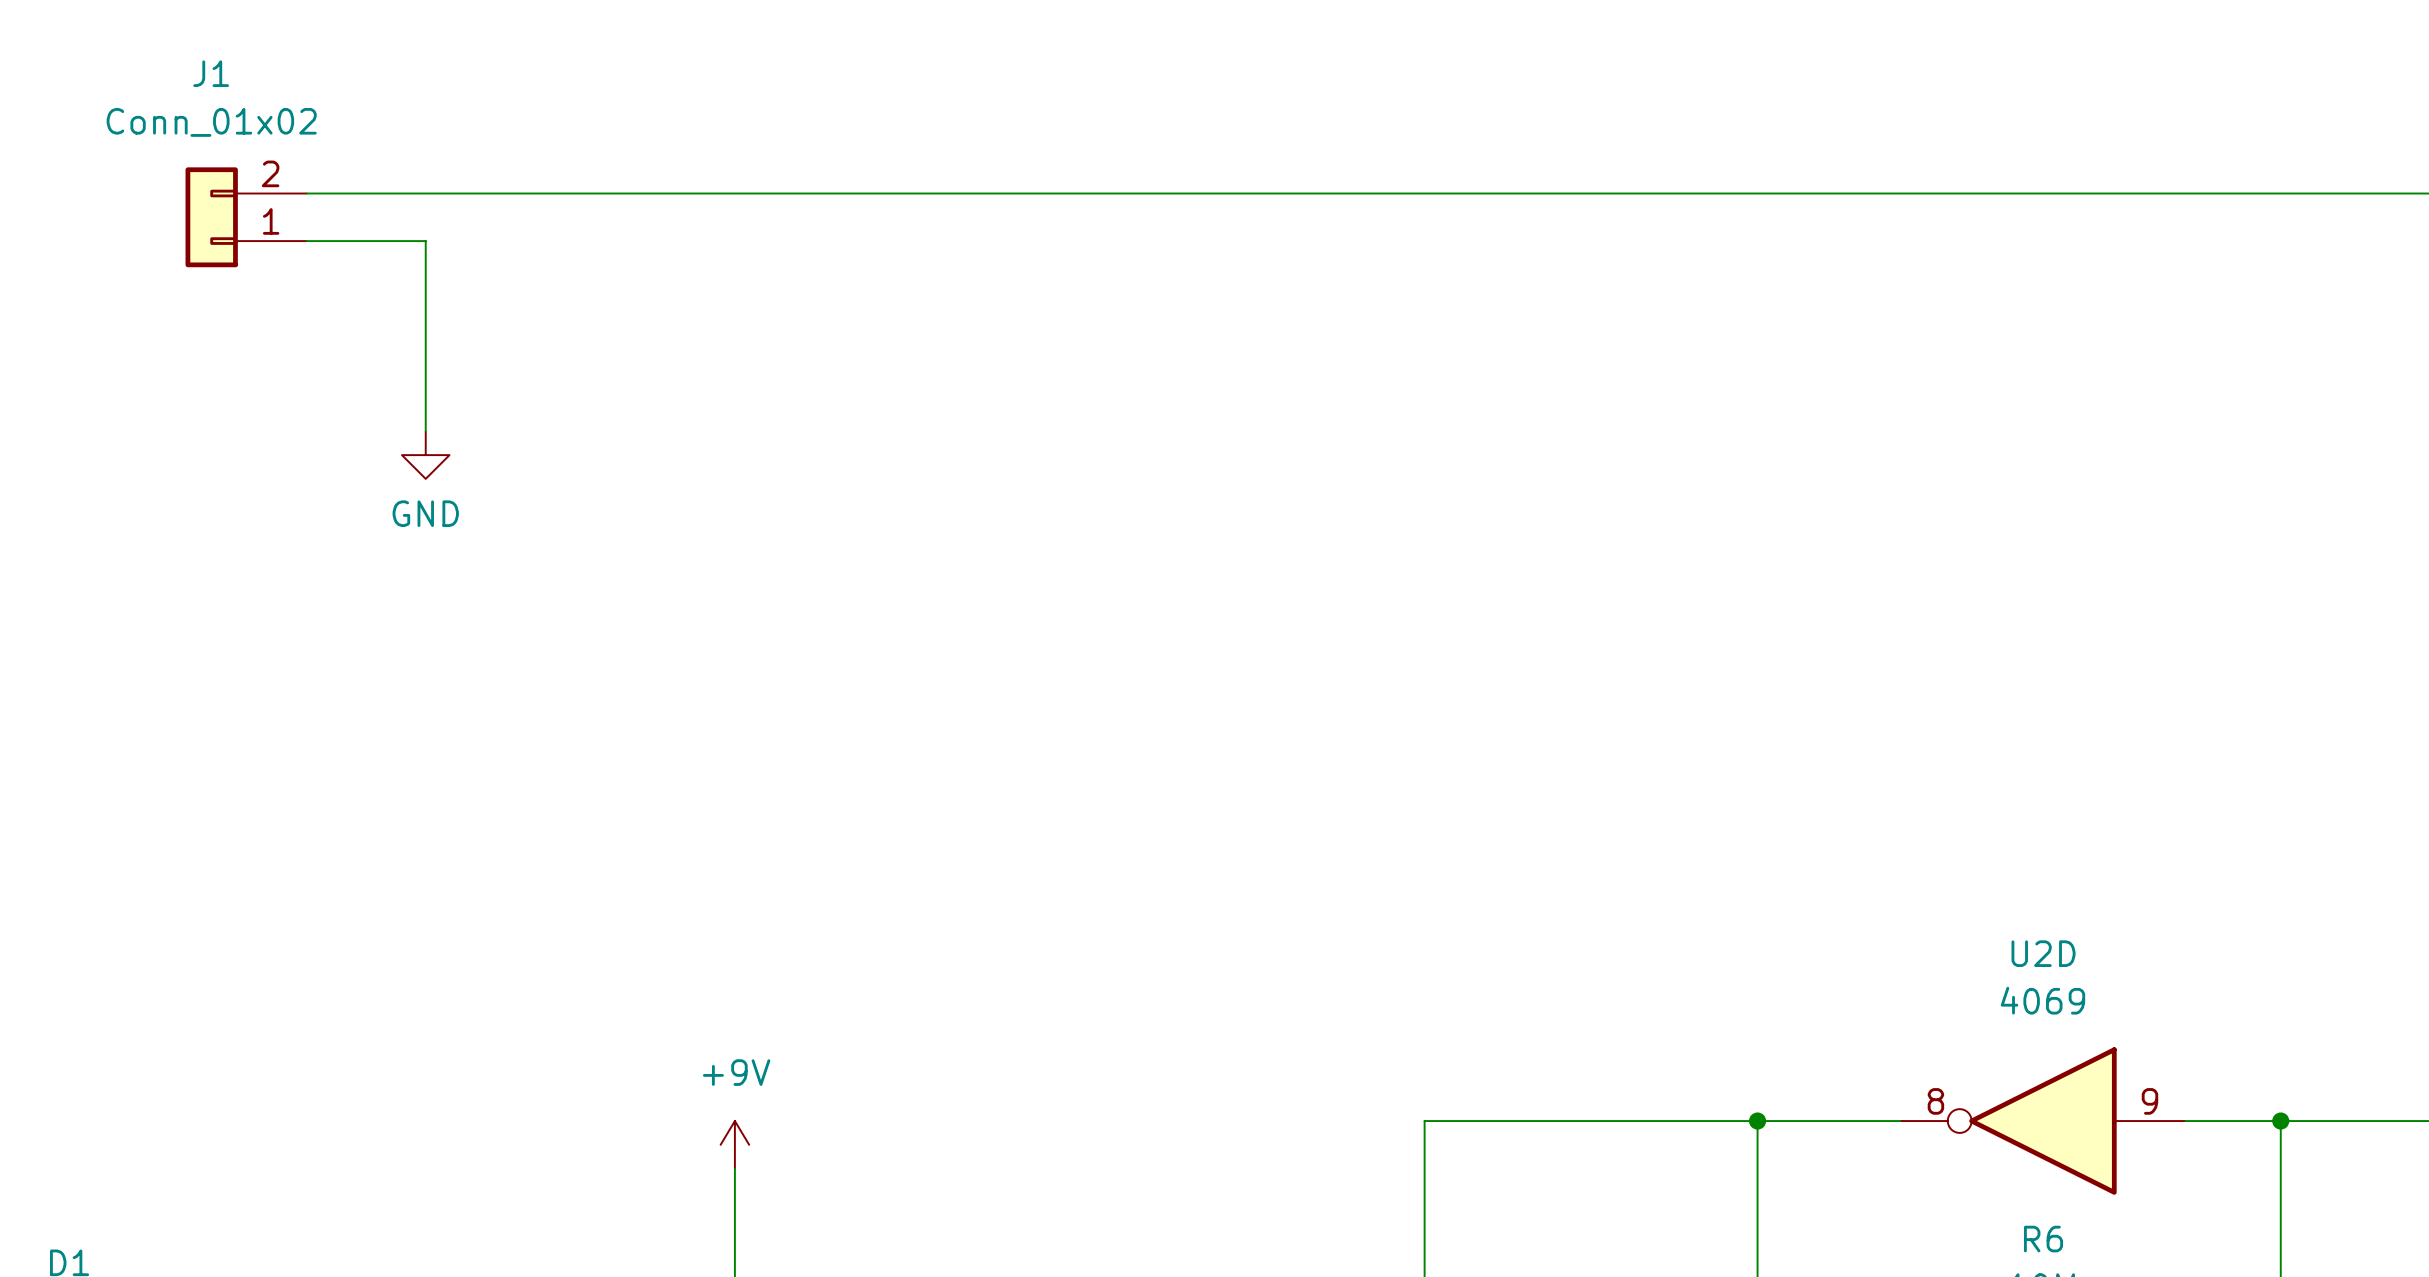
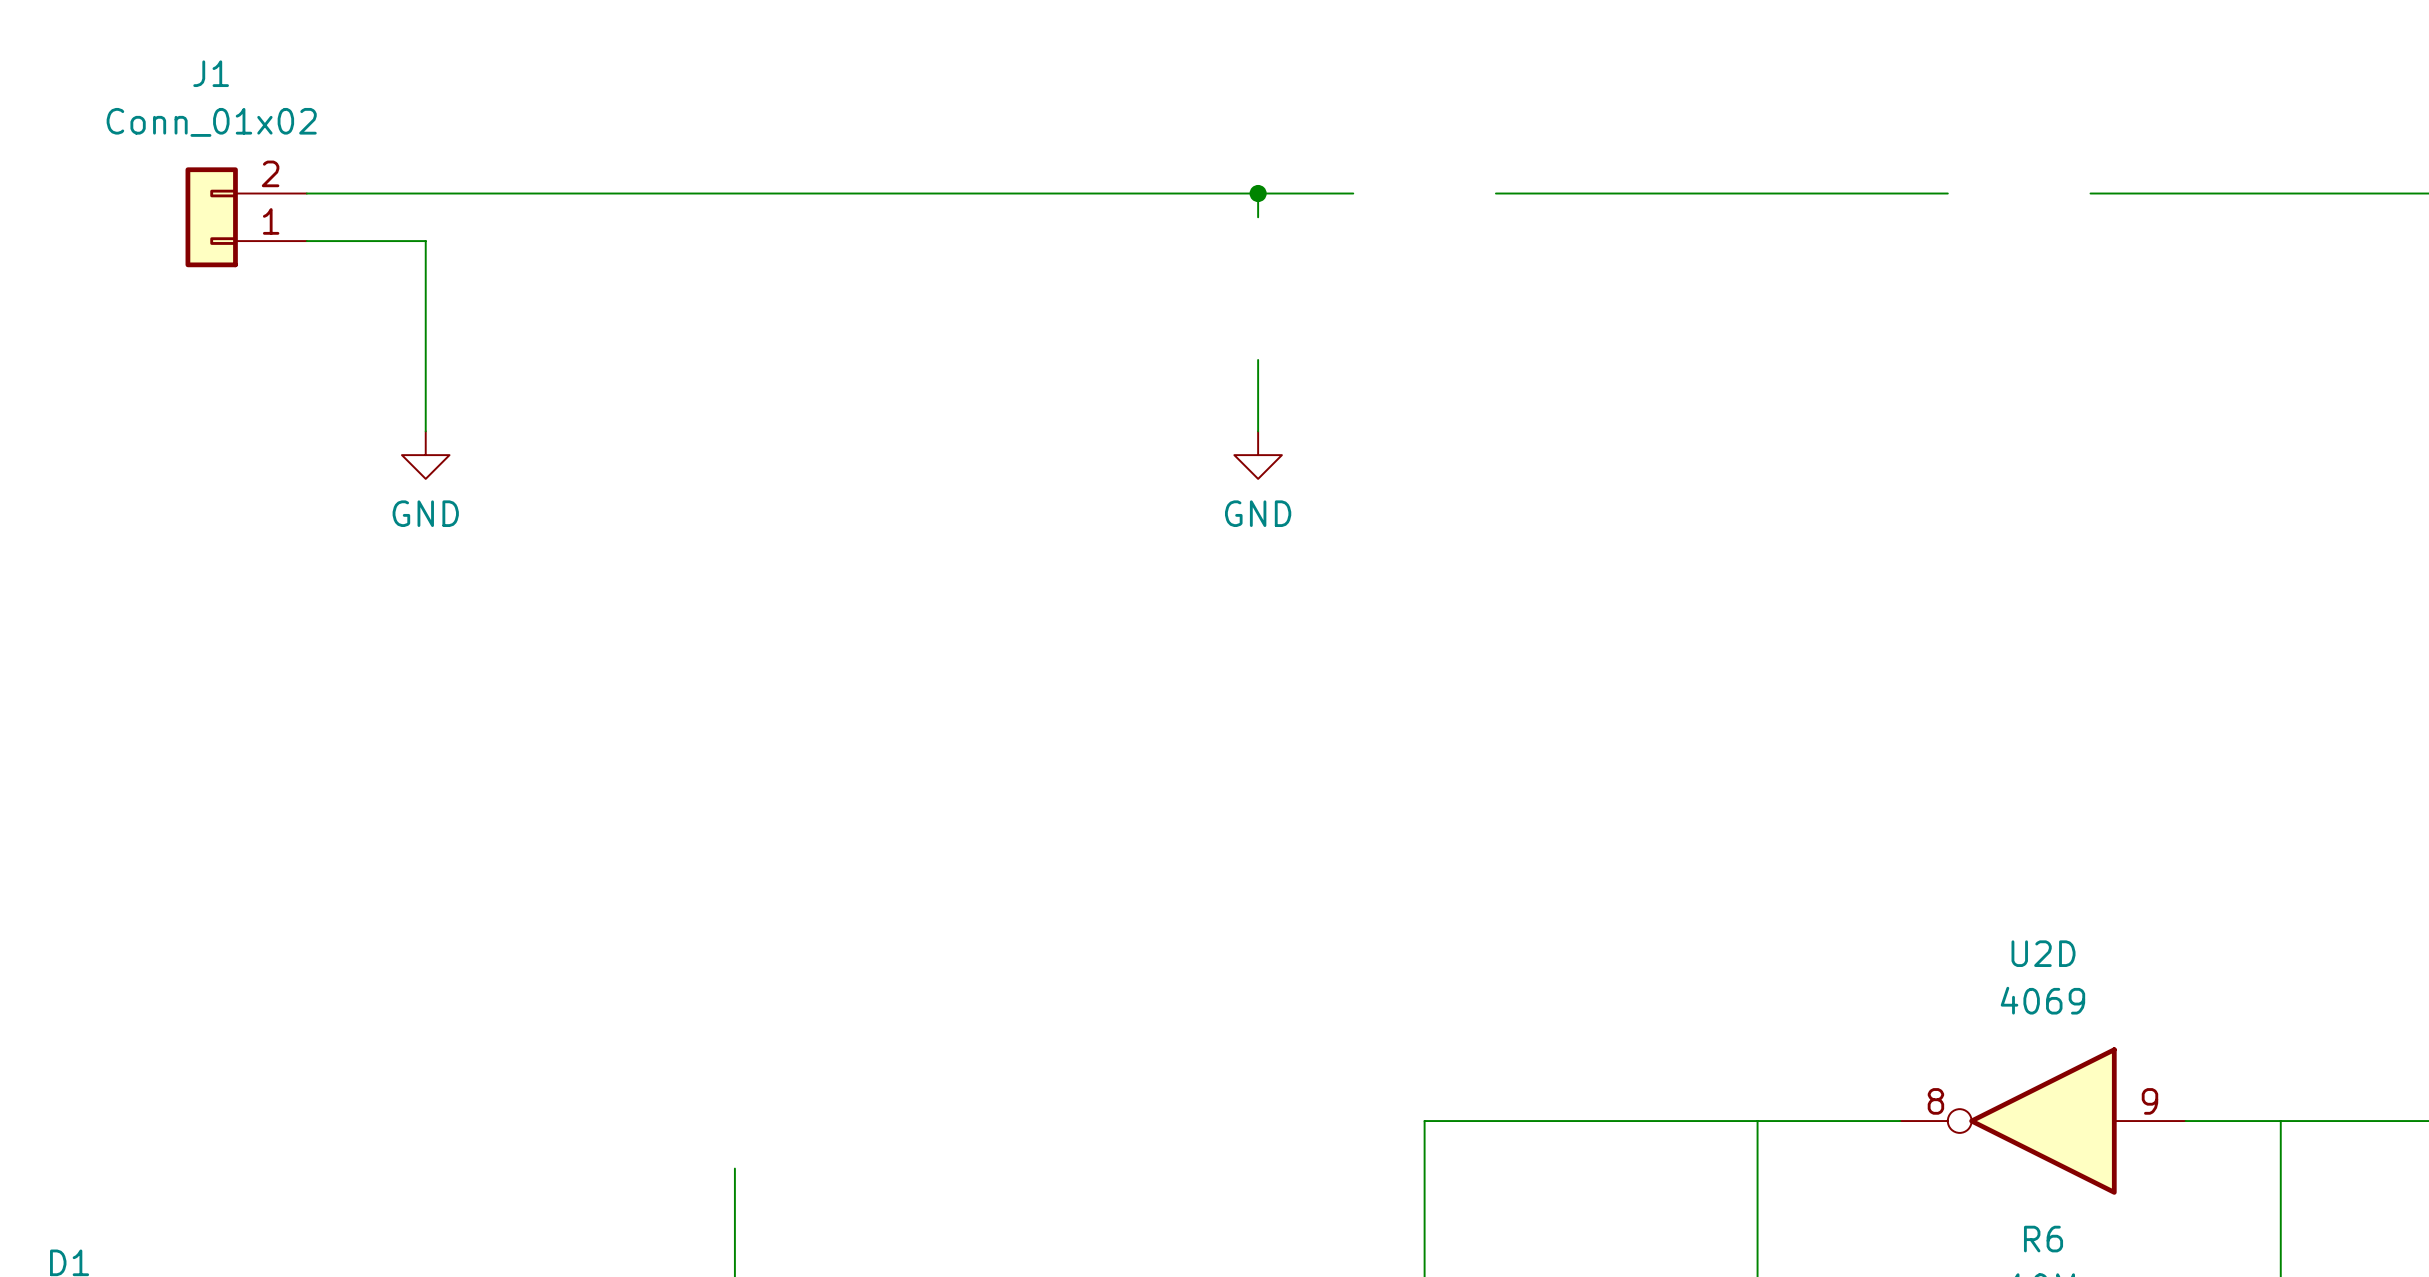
wire: none -> (1258, 193) (1258, 217)
junction: none -> (1258, 193)
wire: (1353, 193) (1495, 193) -> none
wire: (1947, 193) (2090, 193) -> none
wire: none -> (1258, 359) (1258, 431)
power symbol: none -> GND (1258, 455)
junction: (1757, 1121) -> none
junction: (2280, 1121) -> none
power symbol: +9V (734, 1144) -> none

